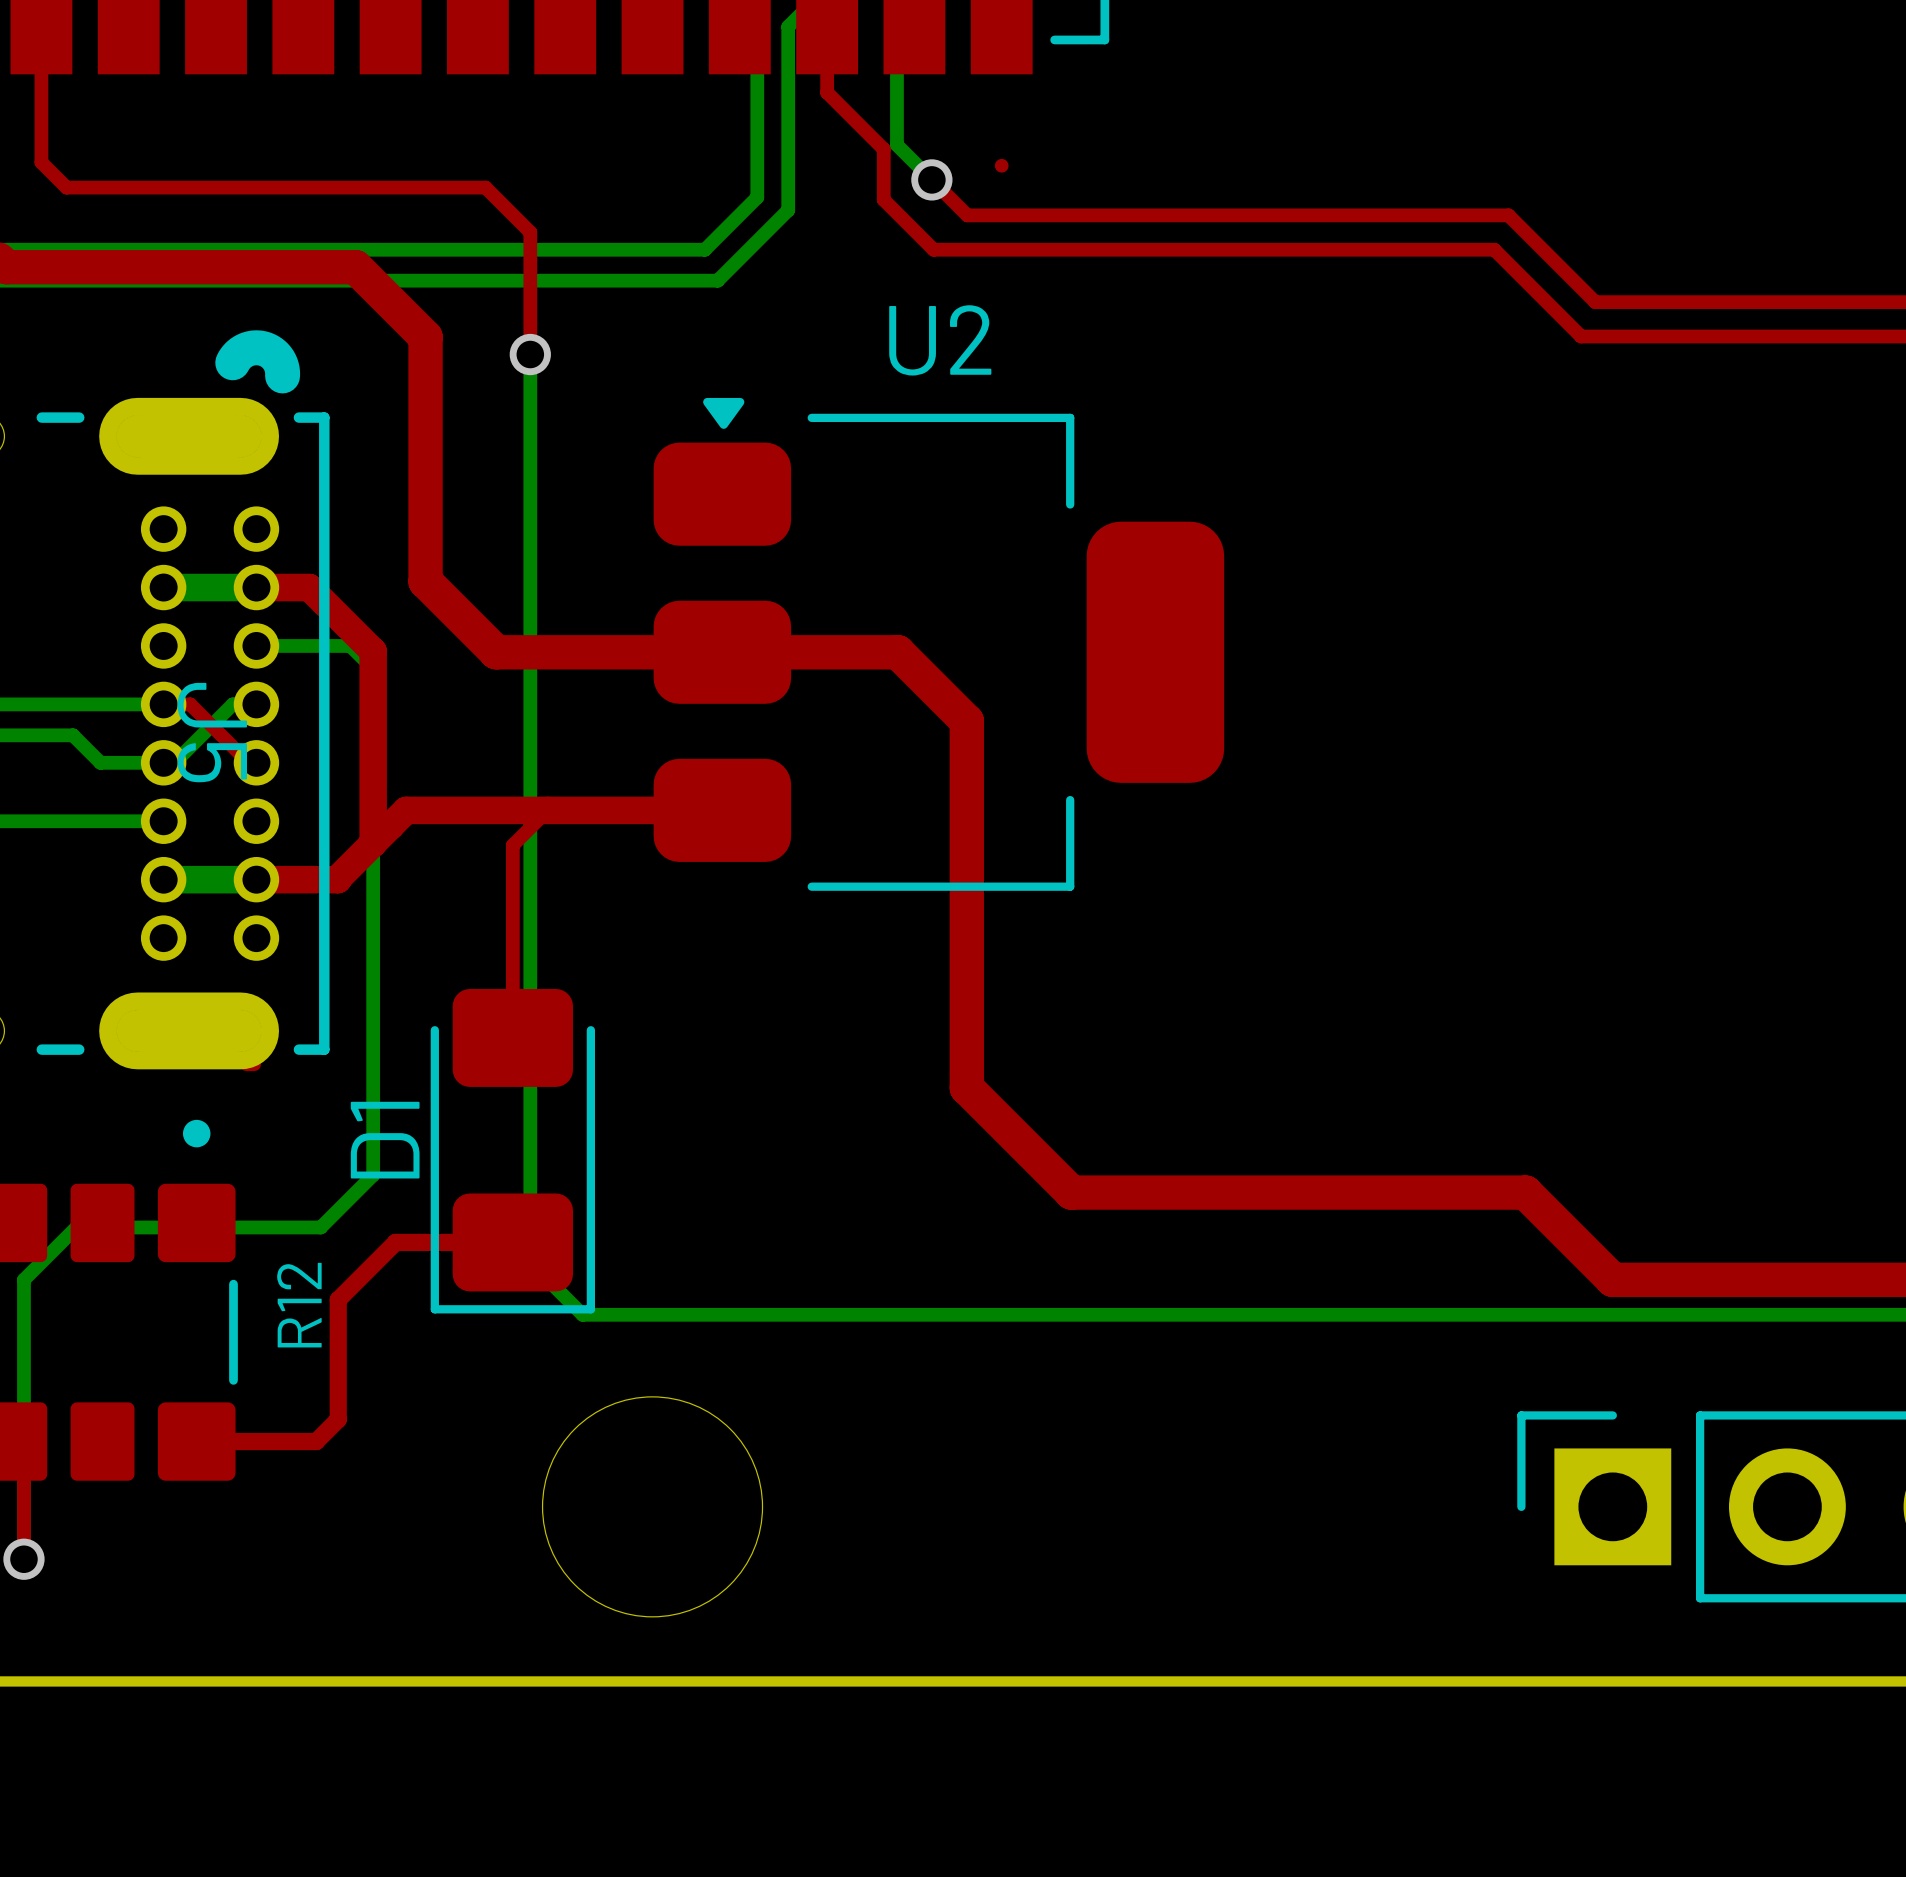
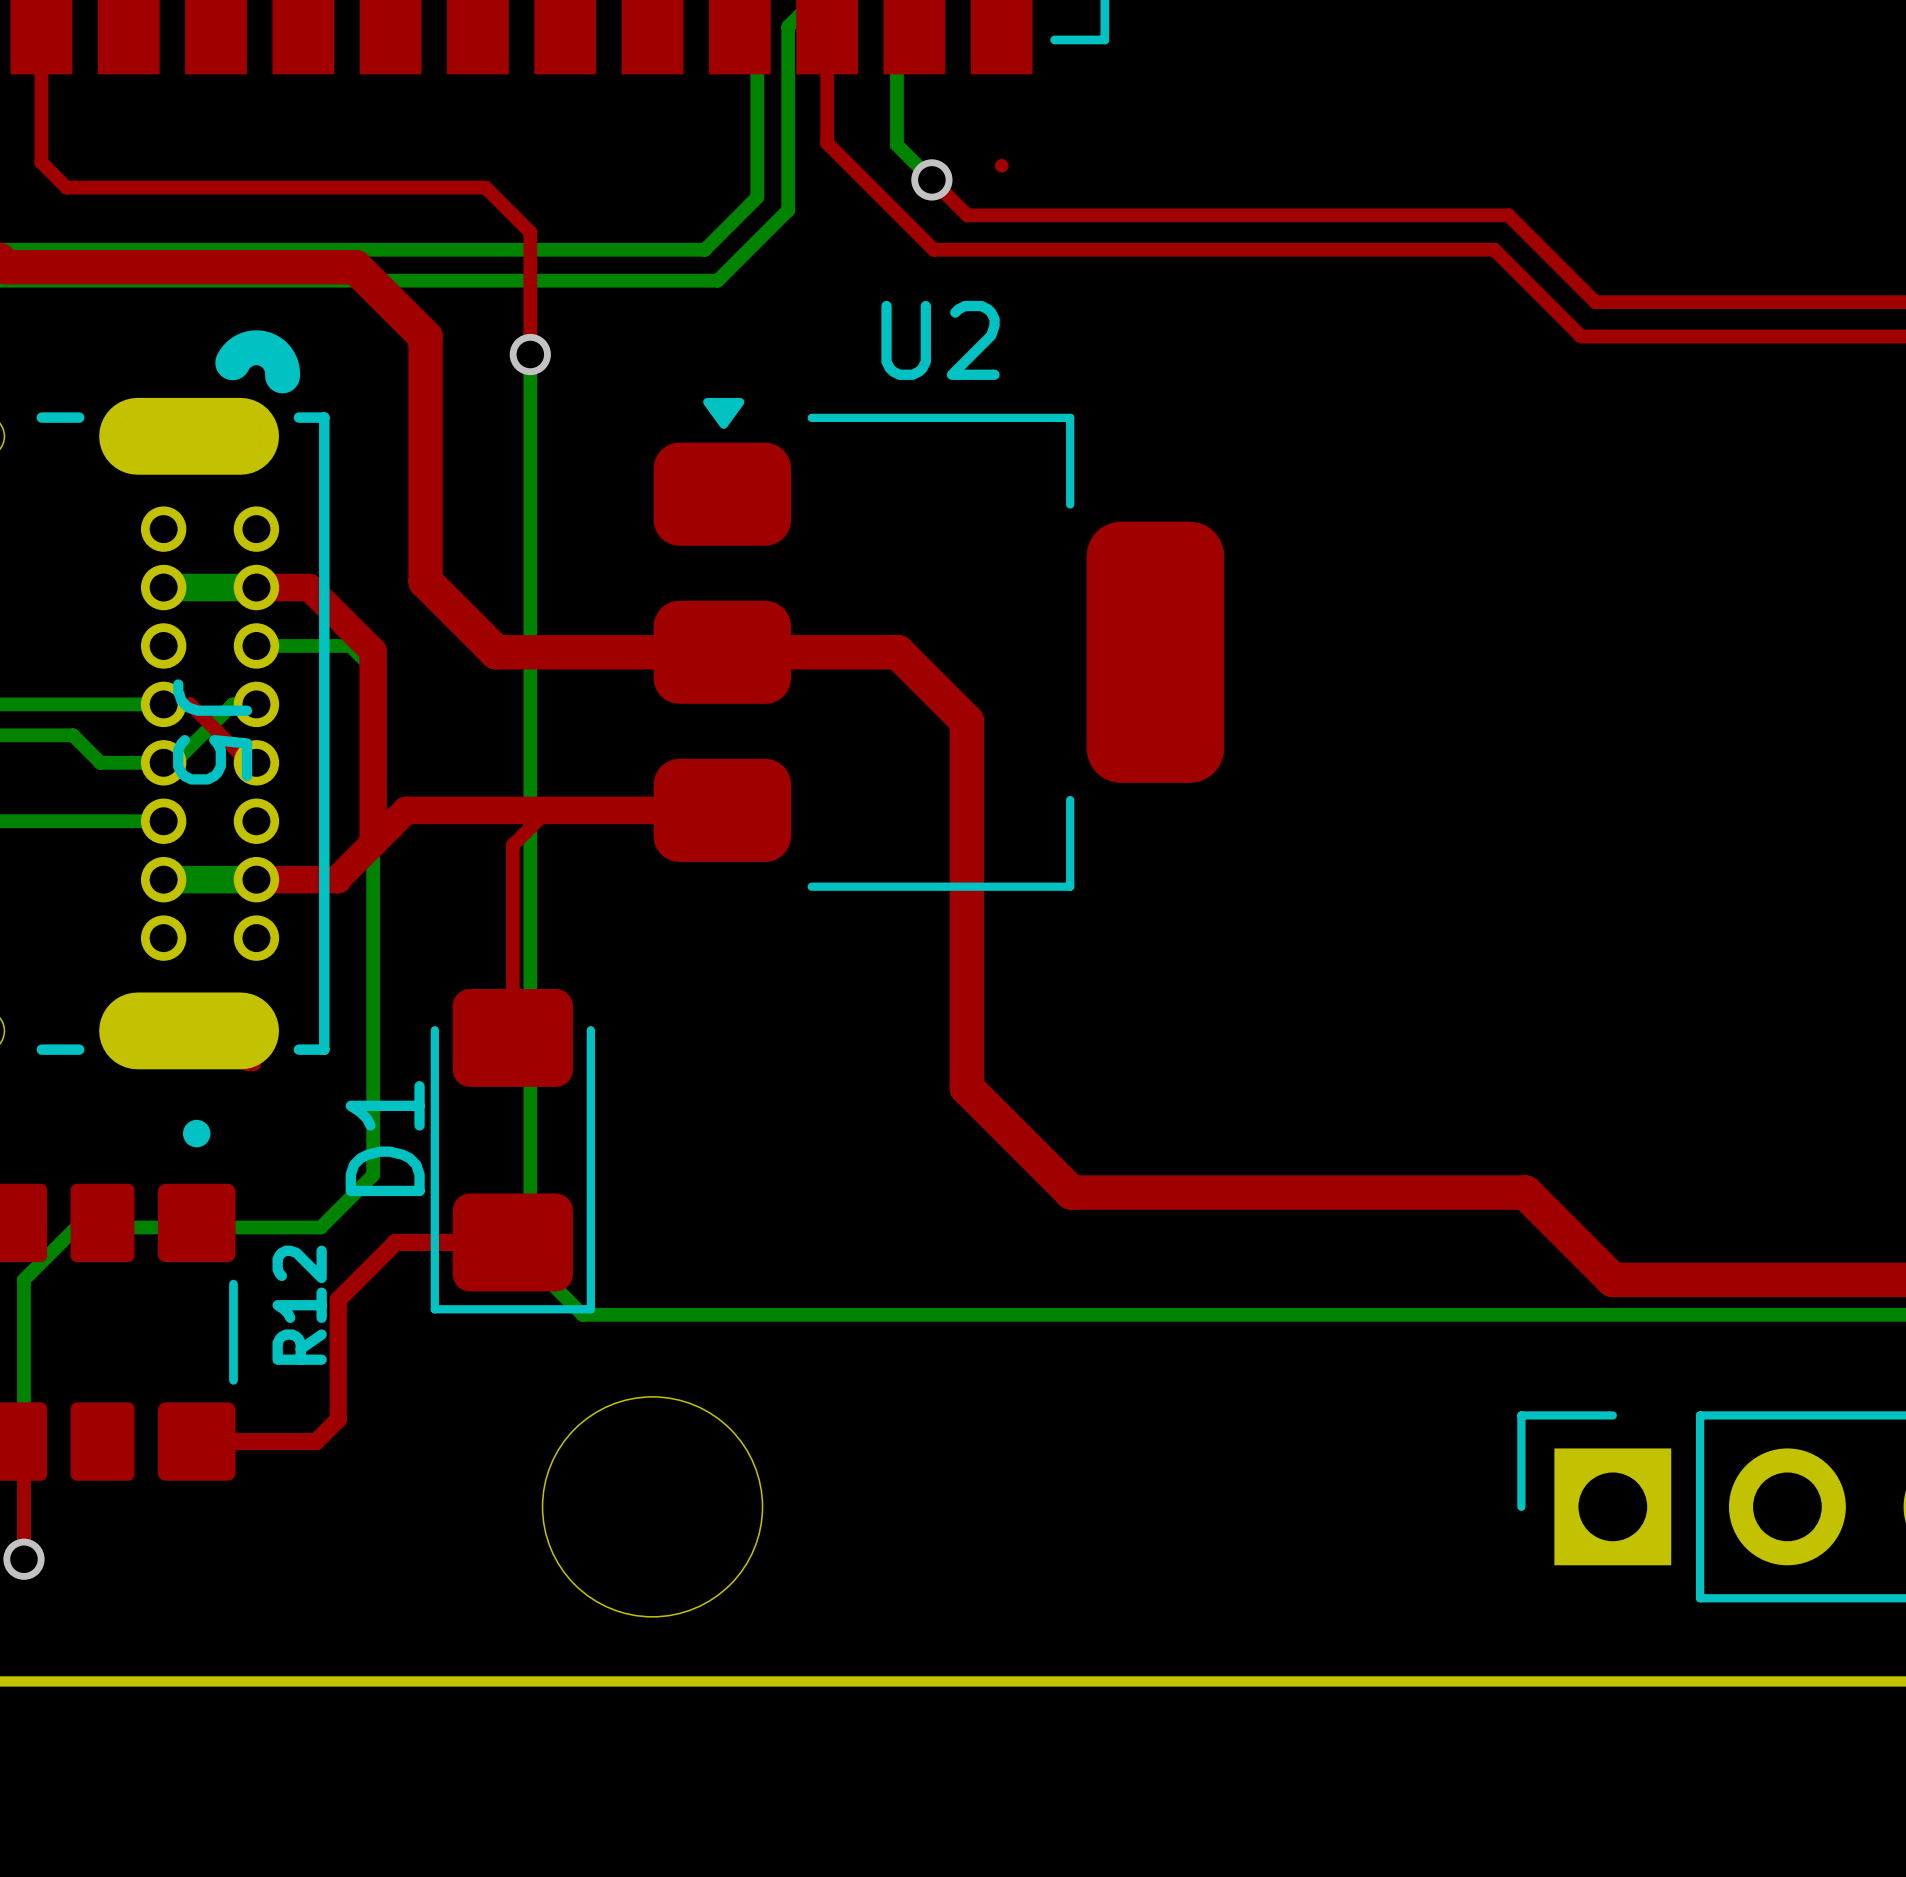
top track: (827, 92) (883, 149) (883, 199) -> (827, 92) (827, 143) (883, 199)

